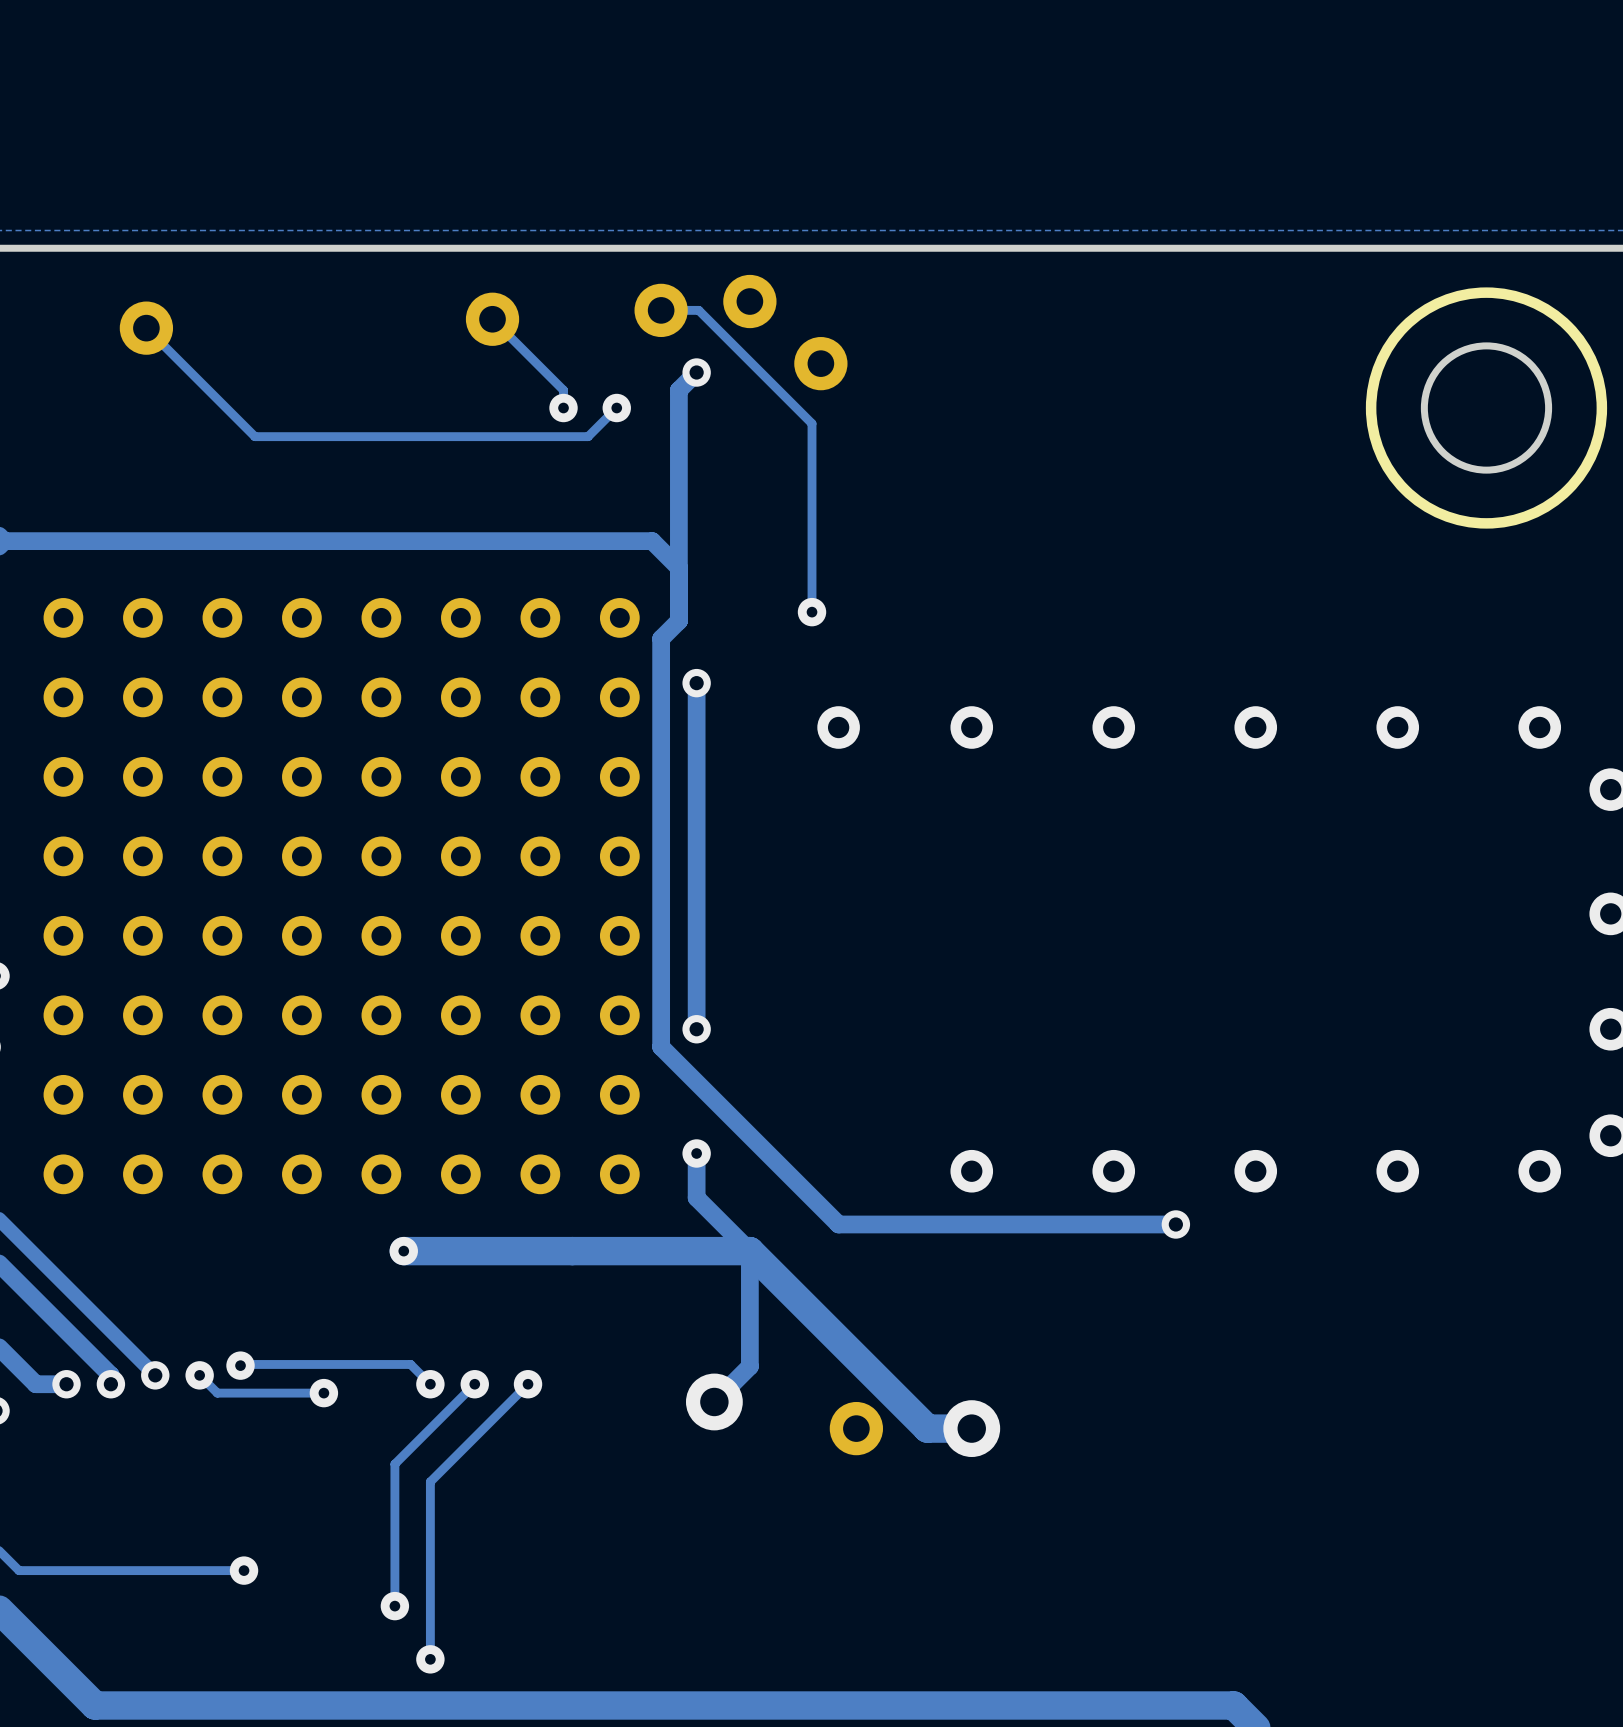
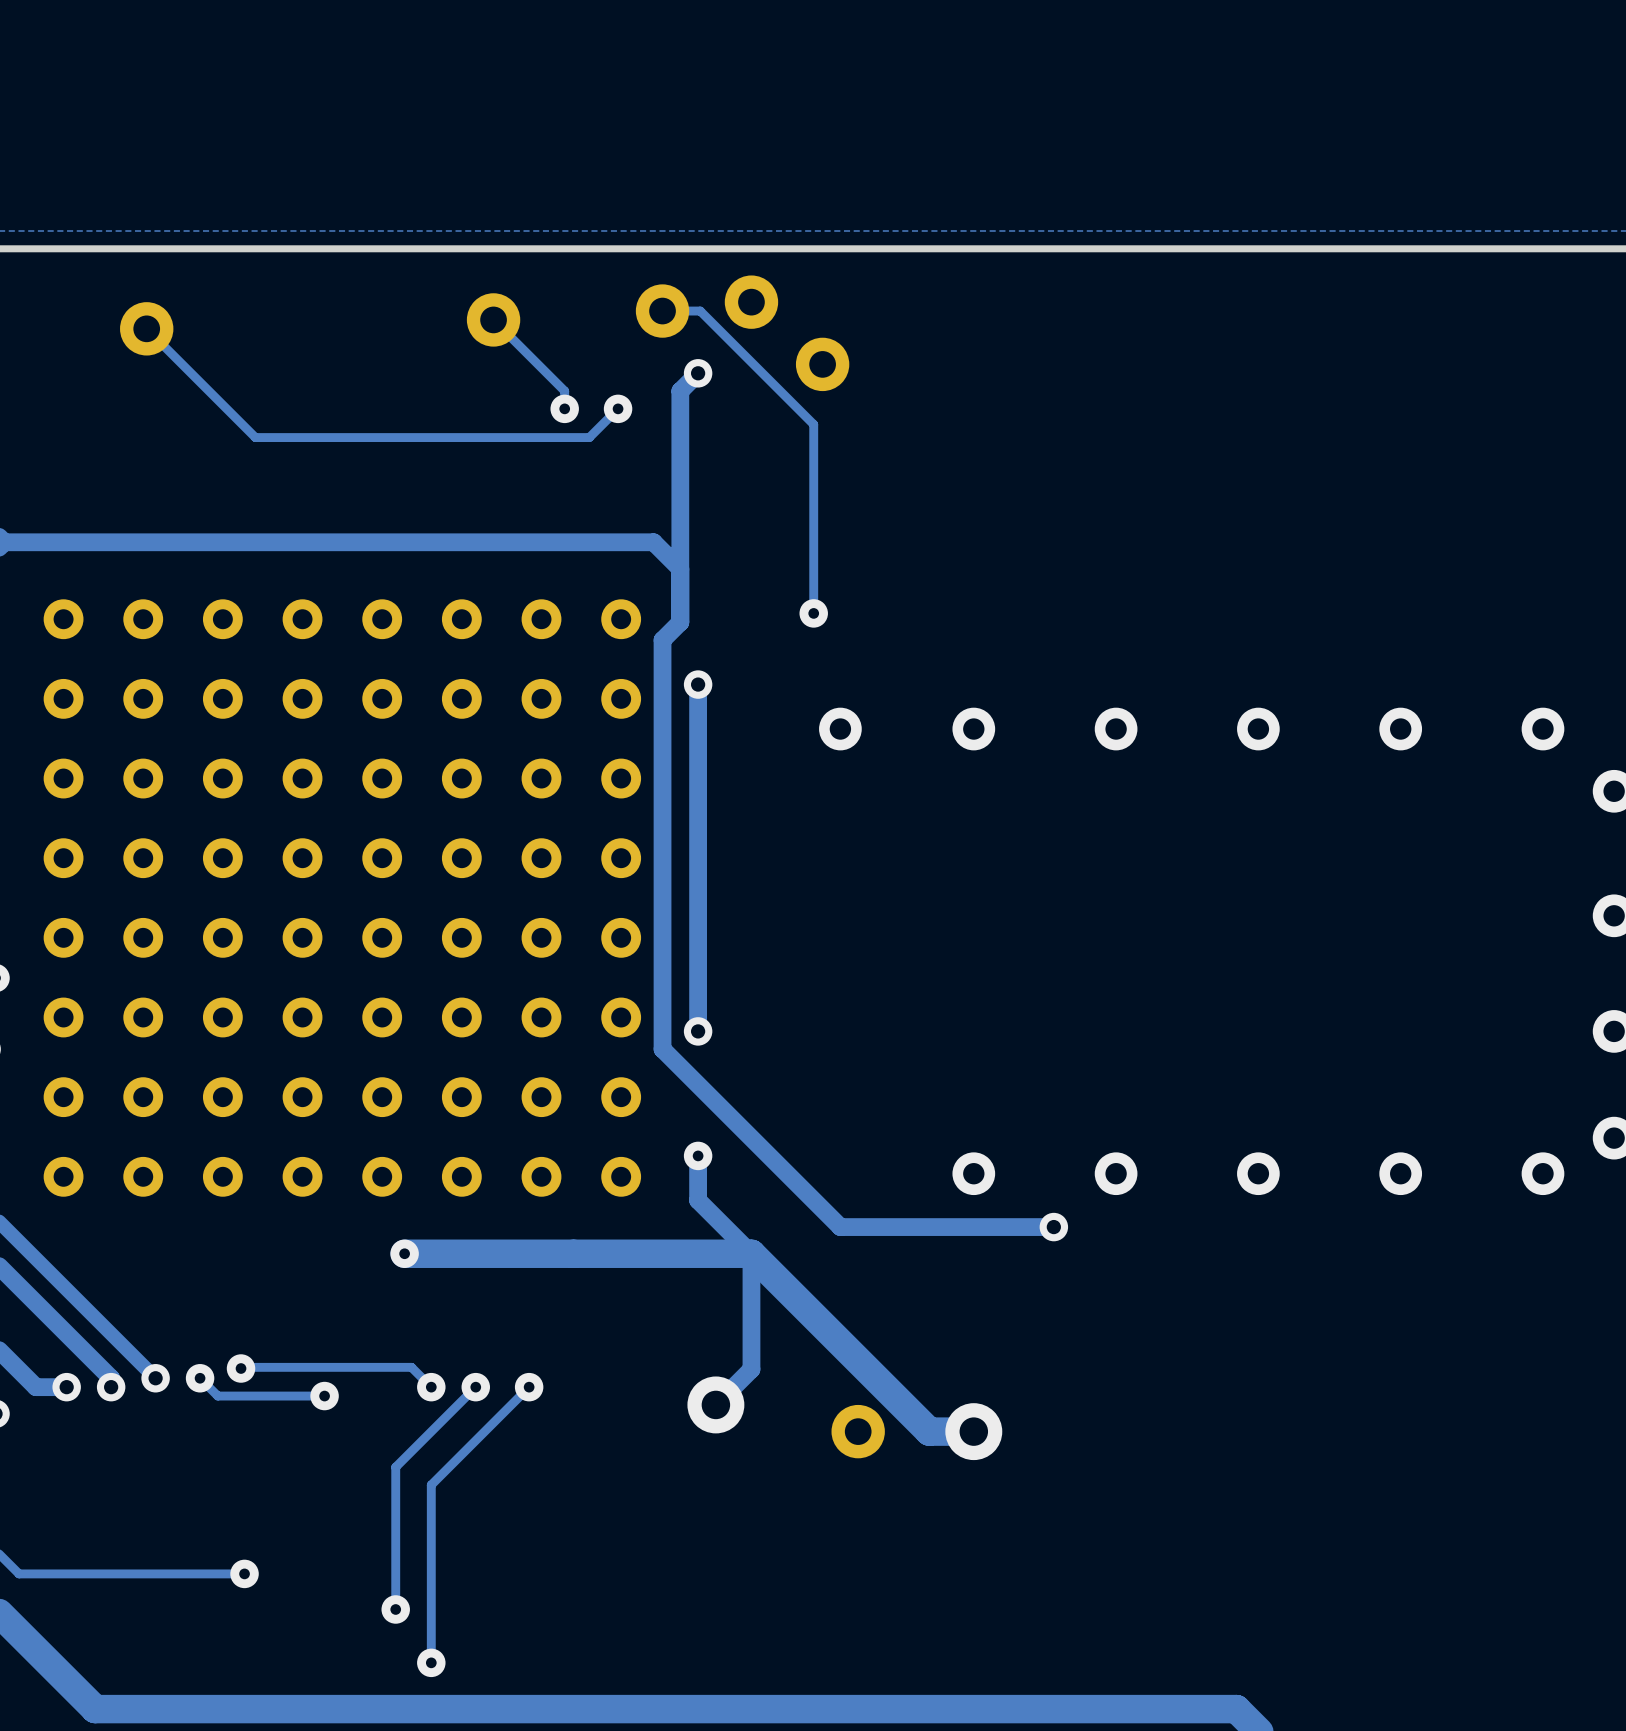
drawing: [1365, 287, 1608, 529] -> none
round board edge: [1420, 342, 1553, 474] -> none
track: (1175, 1224) (1051, 1224) -> none
via position: (1175, 1224) -> (1053, 1227)

